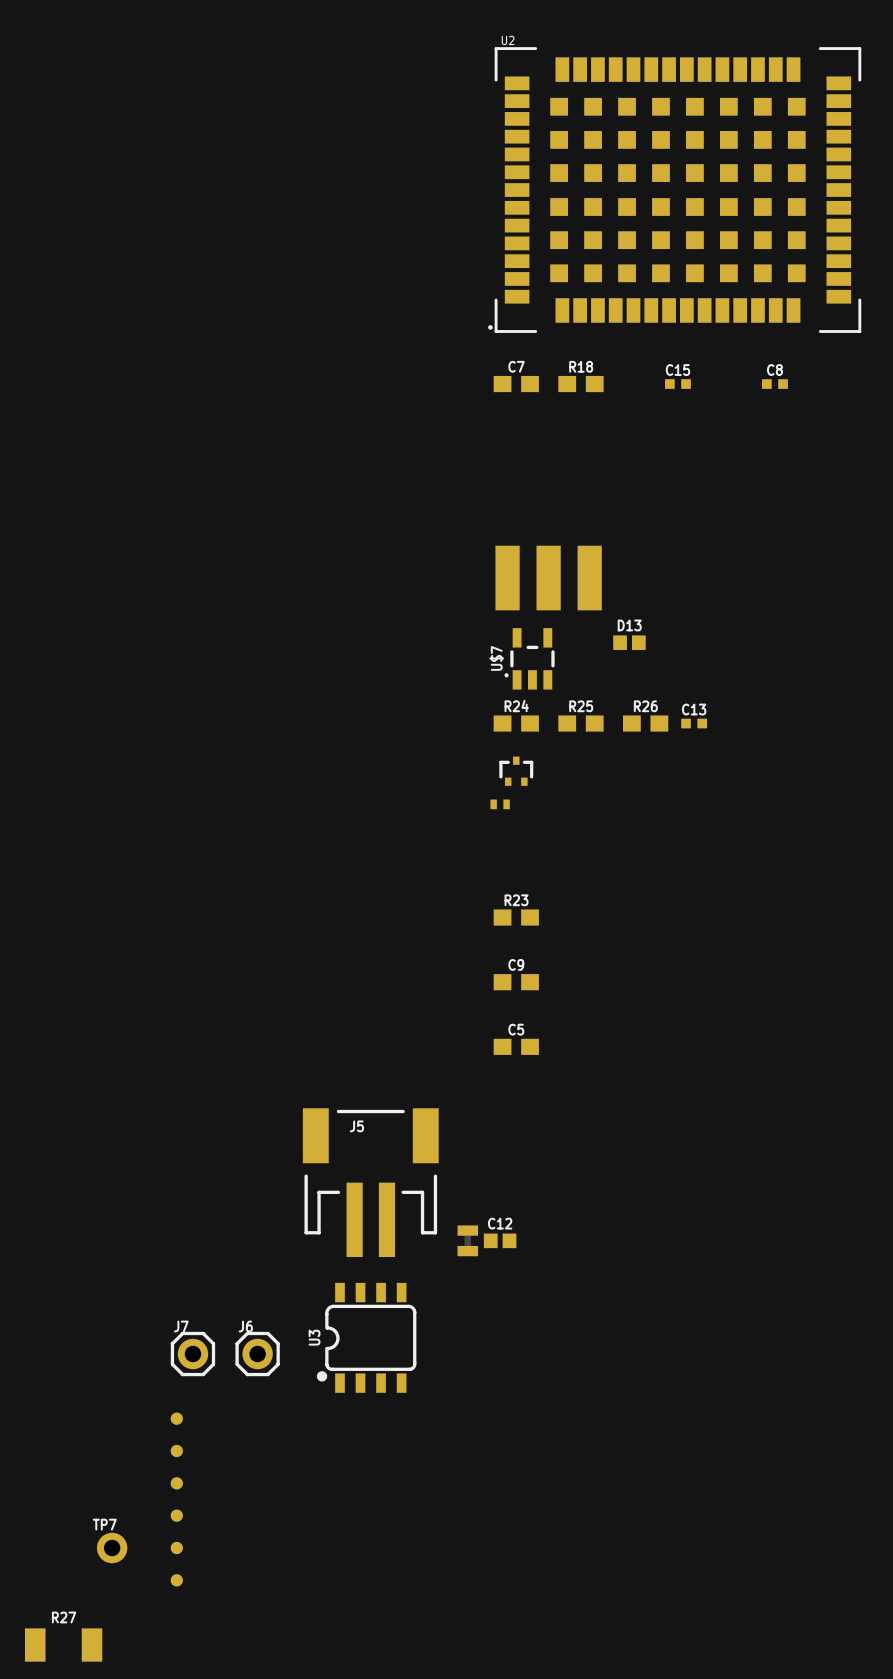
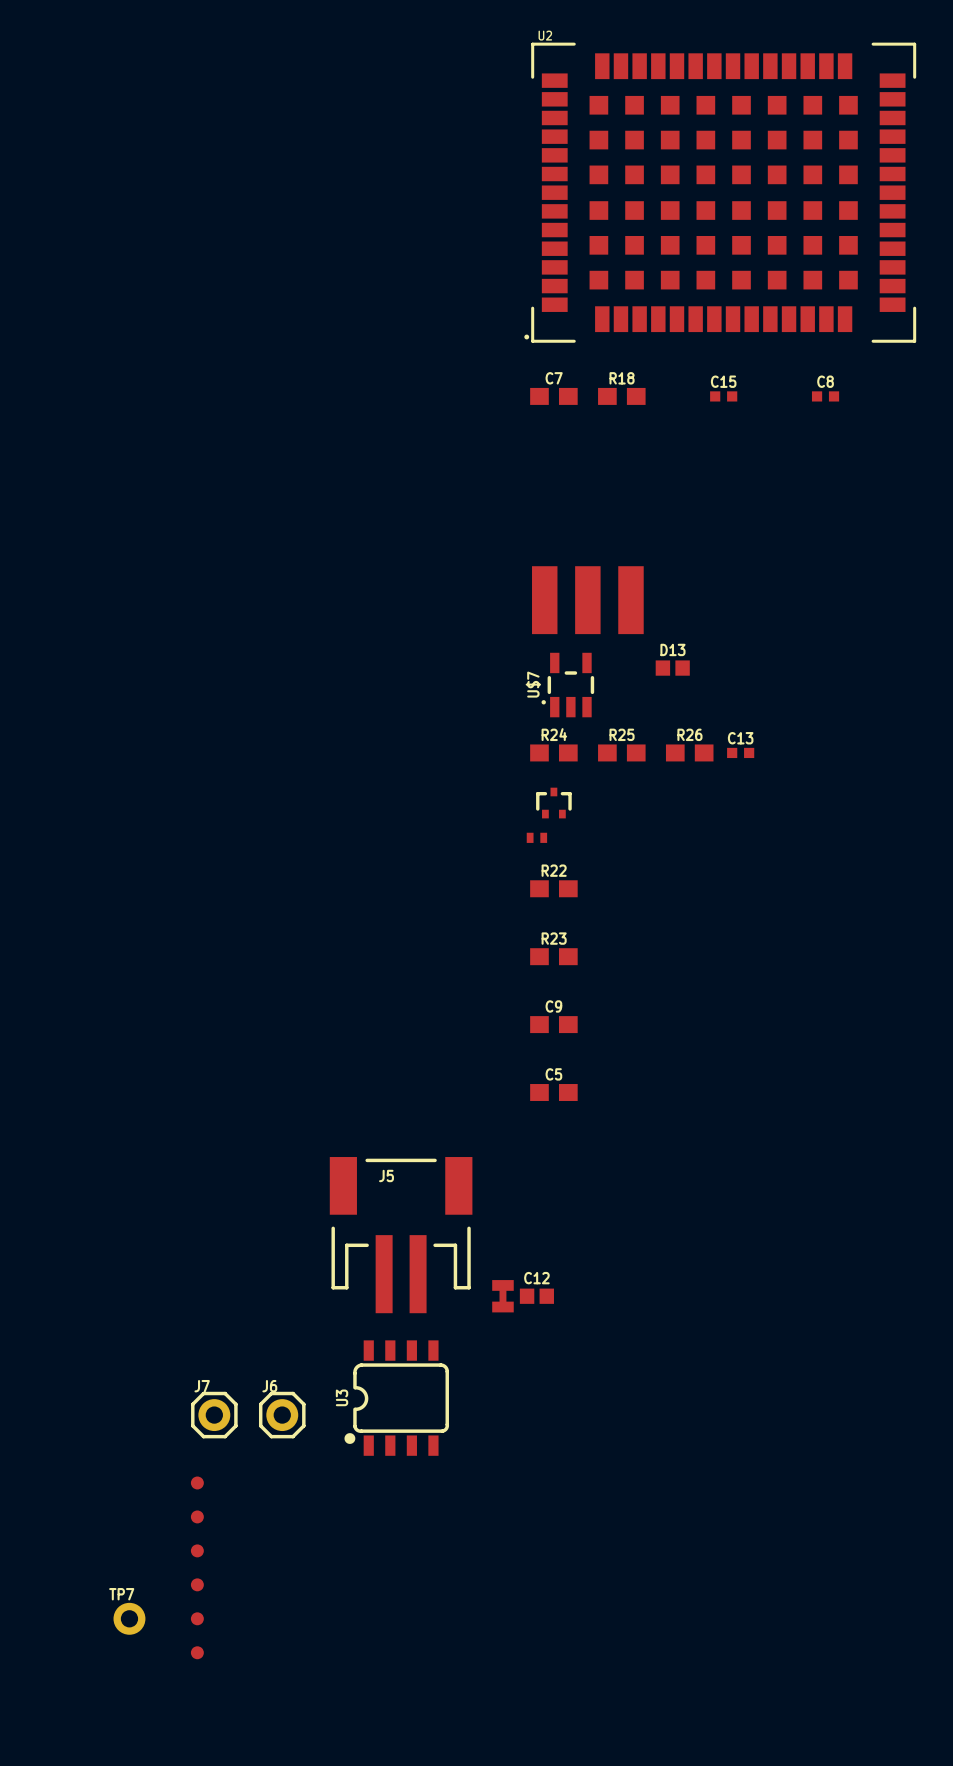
R22: none -> (553, 888)
R27: (63, 1645) -> none

